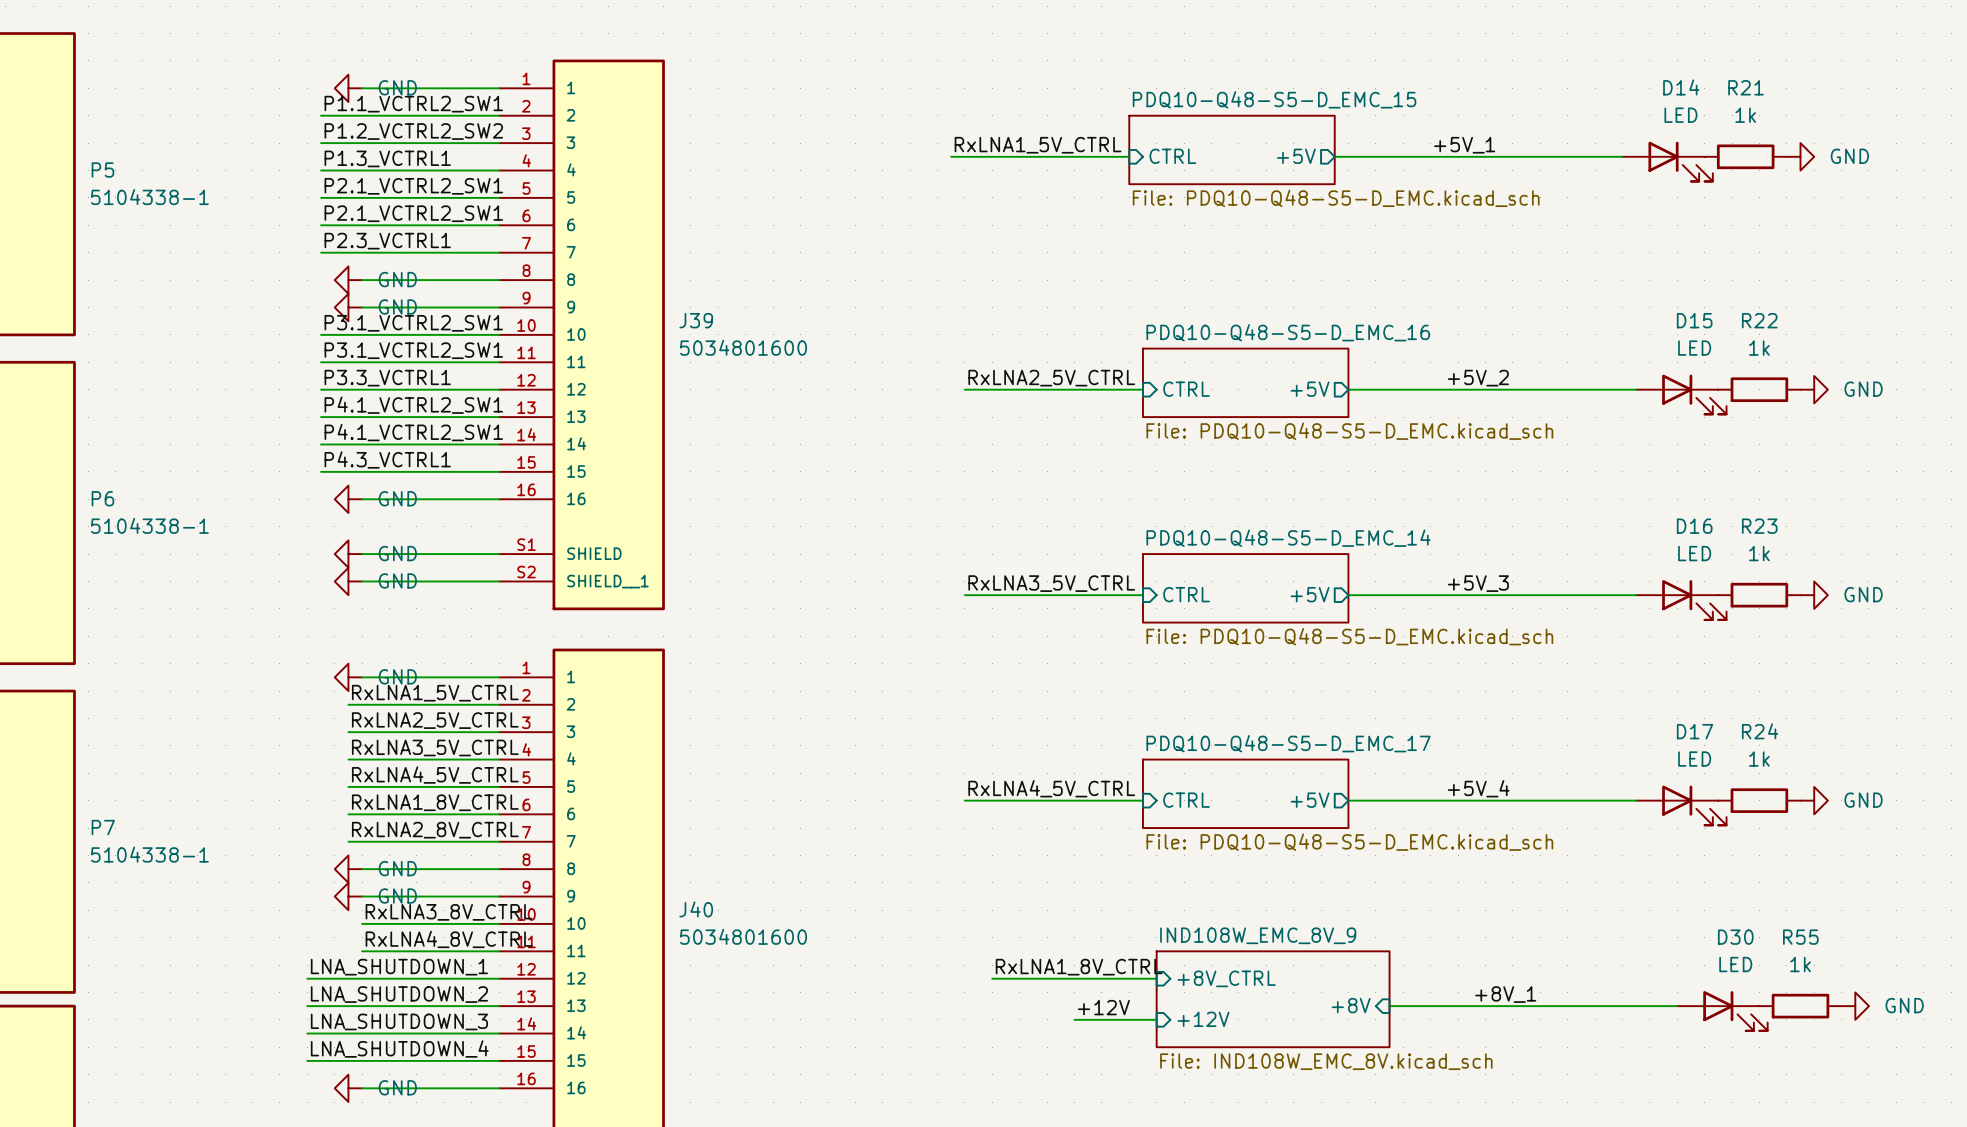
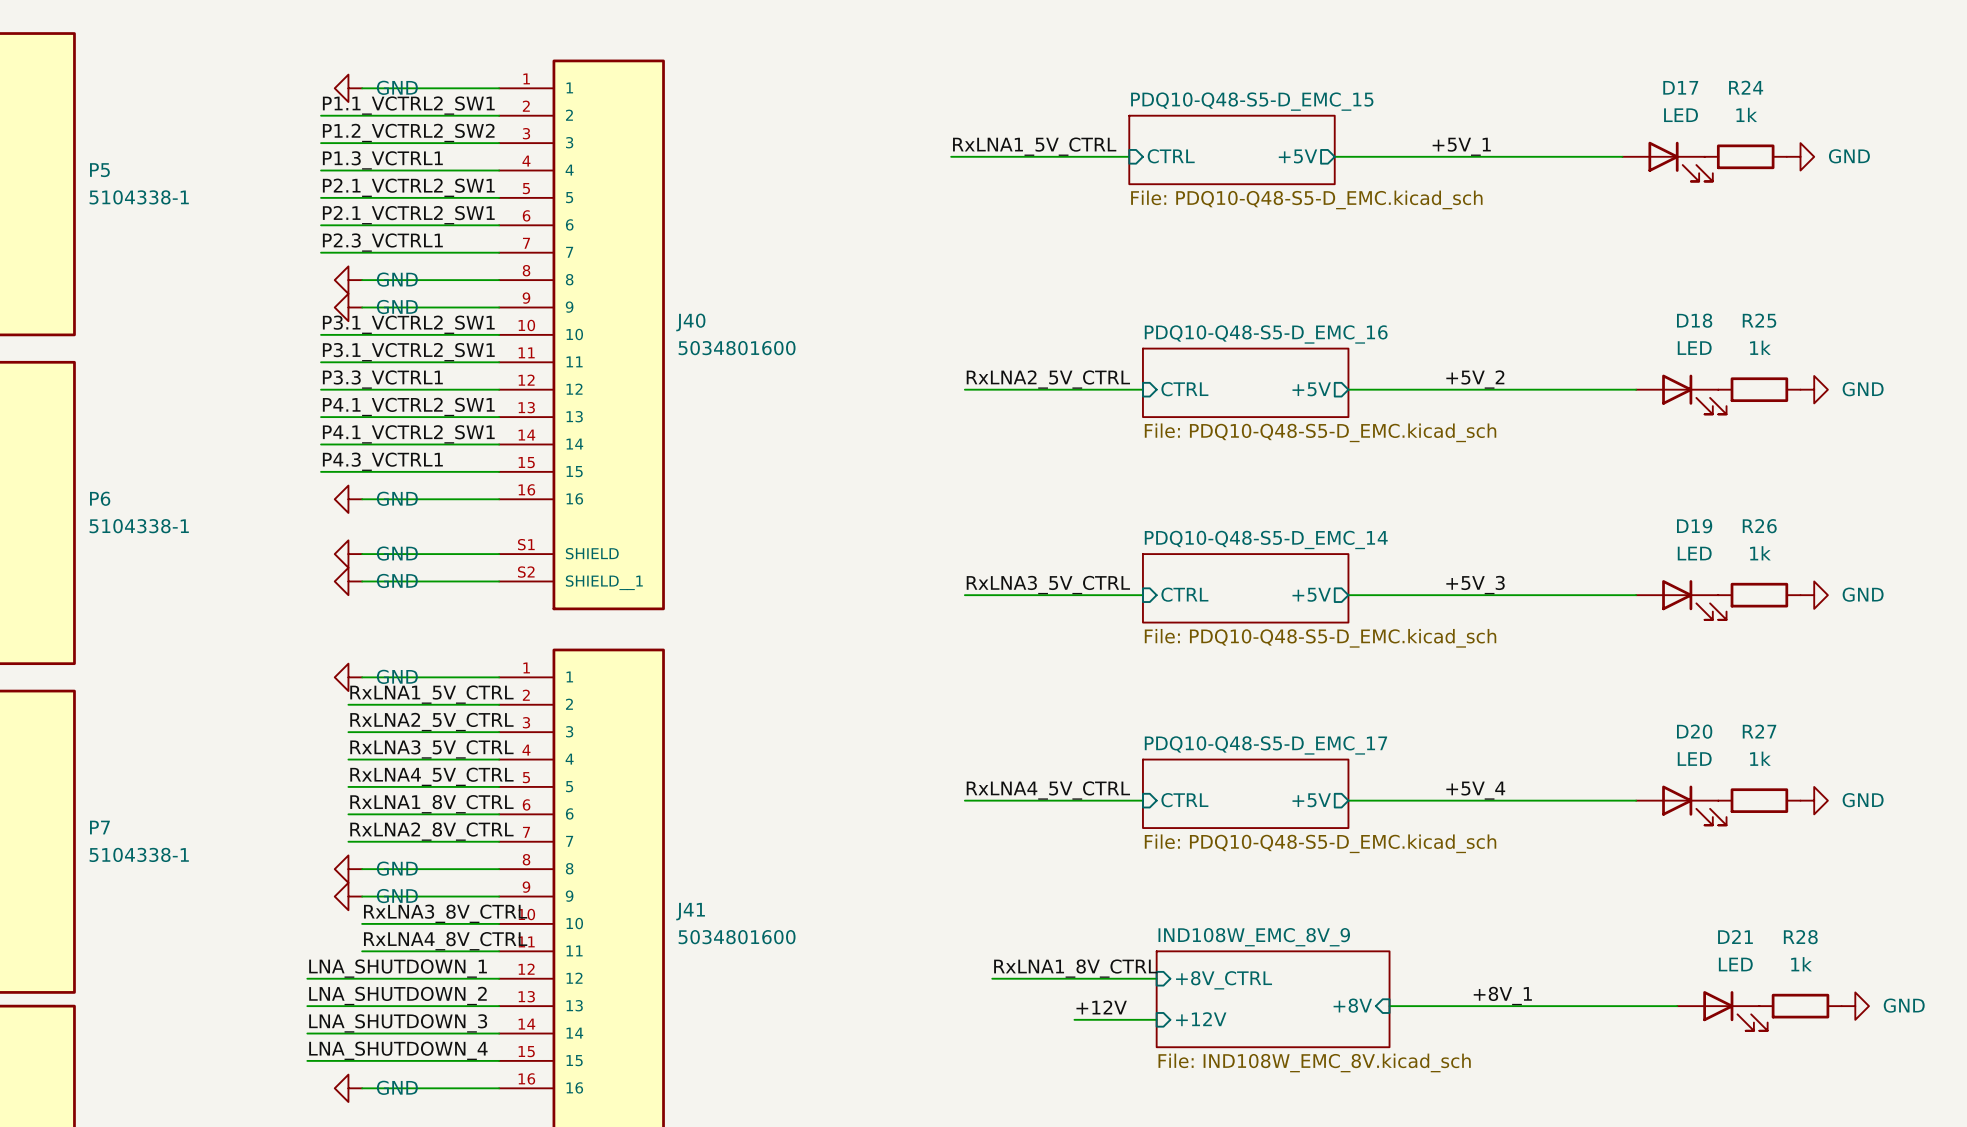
D14 name: D14 (1681, 87) -> D17 (1680, 87)
R21 name: R21 (1746, 87) -> R24 (1746, 87)
J39 name: J39 (696, 320) -> J40 (690, 322)
D15 name: D15 (1694, 320) -> D18 (1694, 320)
R22 name: R22 (1759, 320) -> R25 (1759, 320)
D16 name: D16 (1694, 526) -> D19 (1694, 526)
R23 name: R23 (1759, 526) -> R26 (1759, 526)
D17 name: D17 (1694, 731) -> D20 (1694, 731)
R24 name: R24 (1760, 731) -> R27 (1759, 731)
J40 name: J40 (696, 909) -> J41 (690, 911)
D30 name: D30 (1735, 937) -> D21 (1735, 937)
R55 name: R55 (1800, 937) -> R28 (1800, 937)

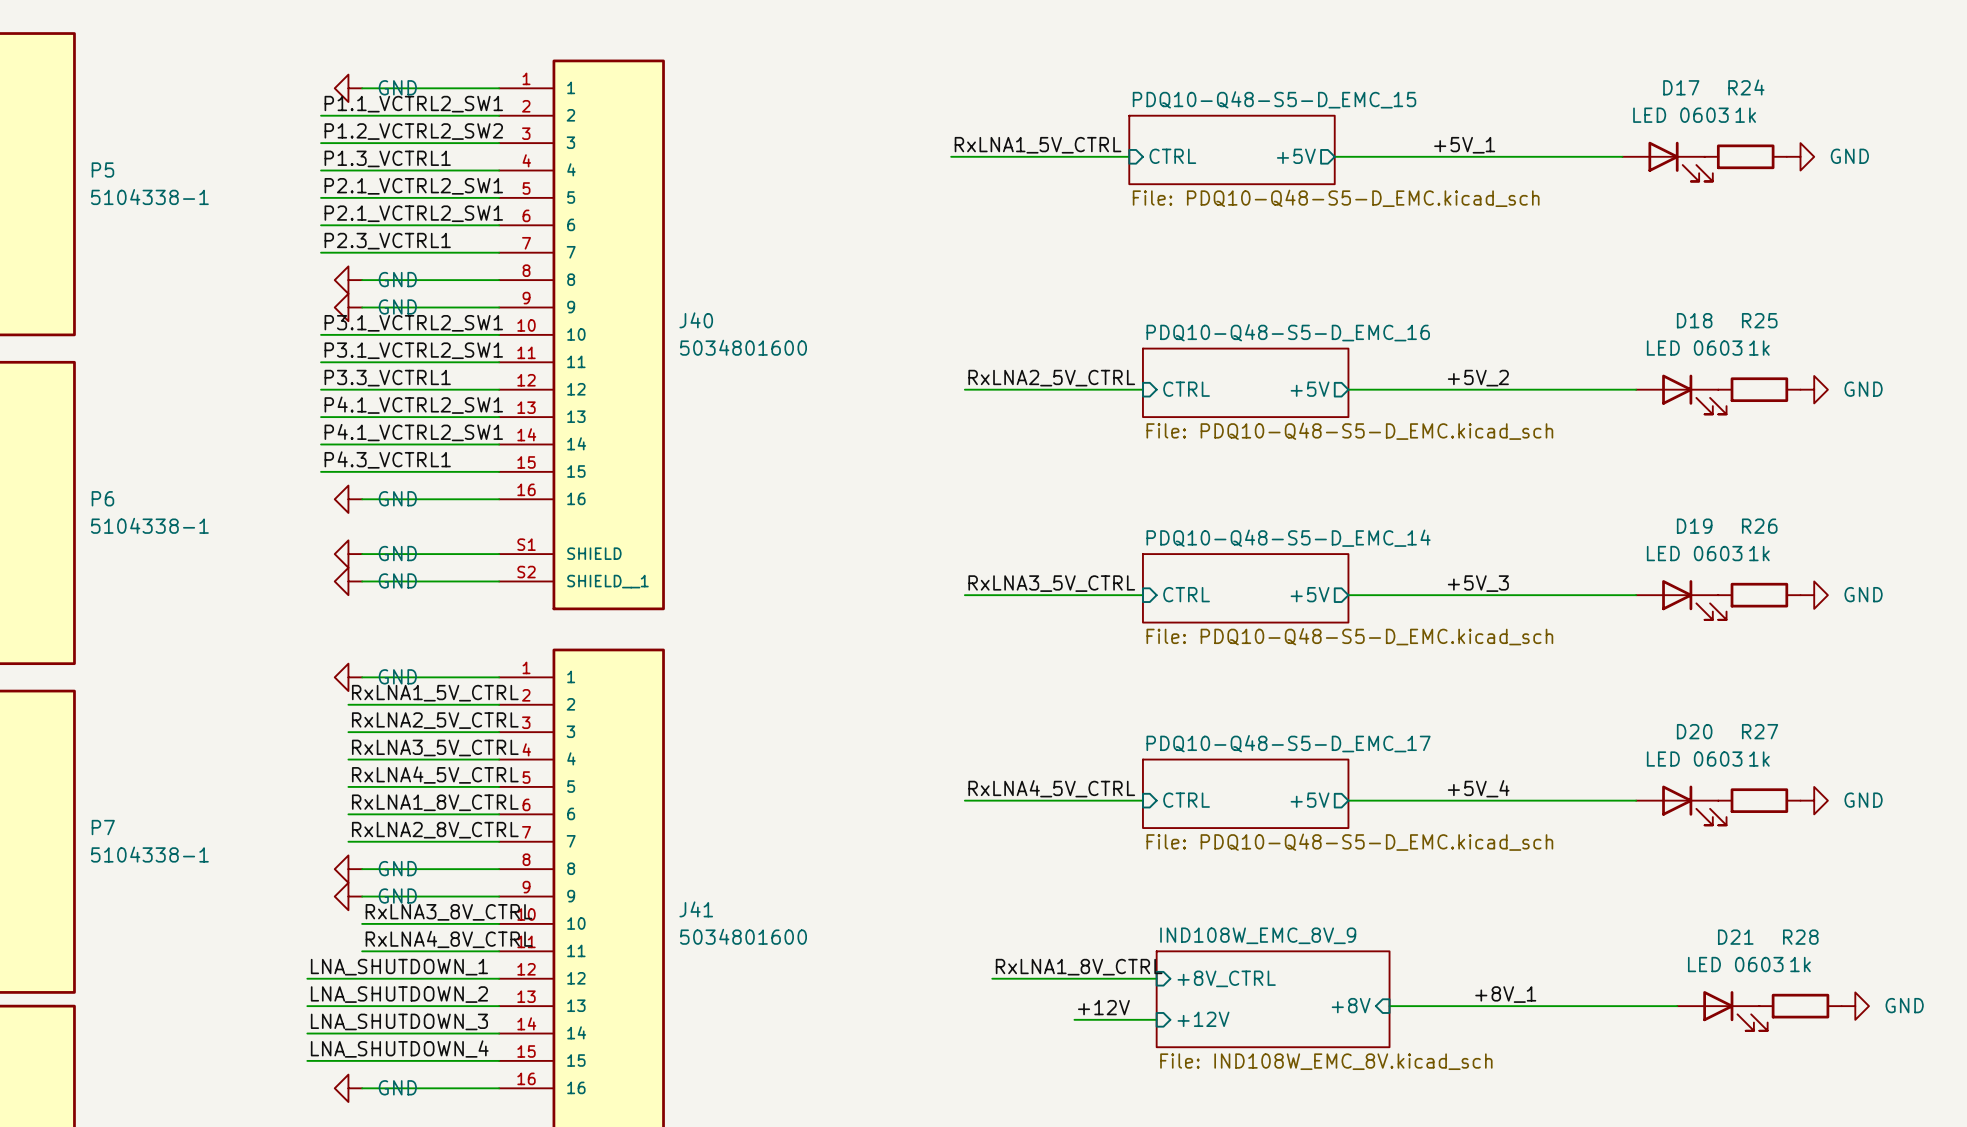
D17 value: LED (1681, 115) -> LED 0603 (1680, 115)
D18 value: LED (1694, 348) -> LED 0603 (1694, 348)
D19 value: LED (1694, 553) -> LED 0603 (1694, 553)
D20 value: LED (1694, 759) -> LED 0603 (1694, 759)
D21 value: LED (1735, 964) -> LED 0603 (1735, 964)

